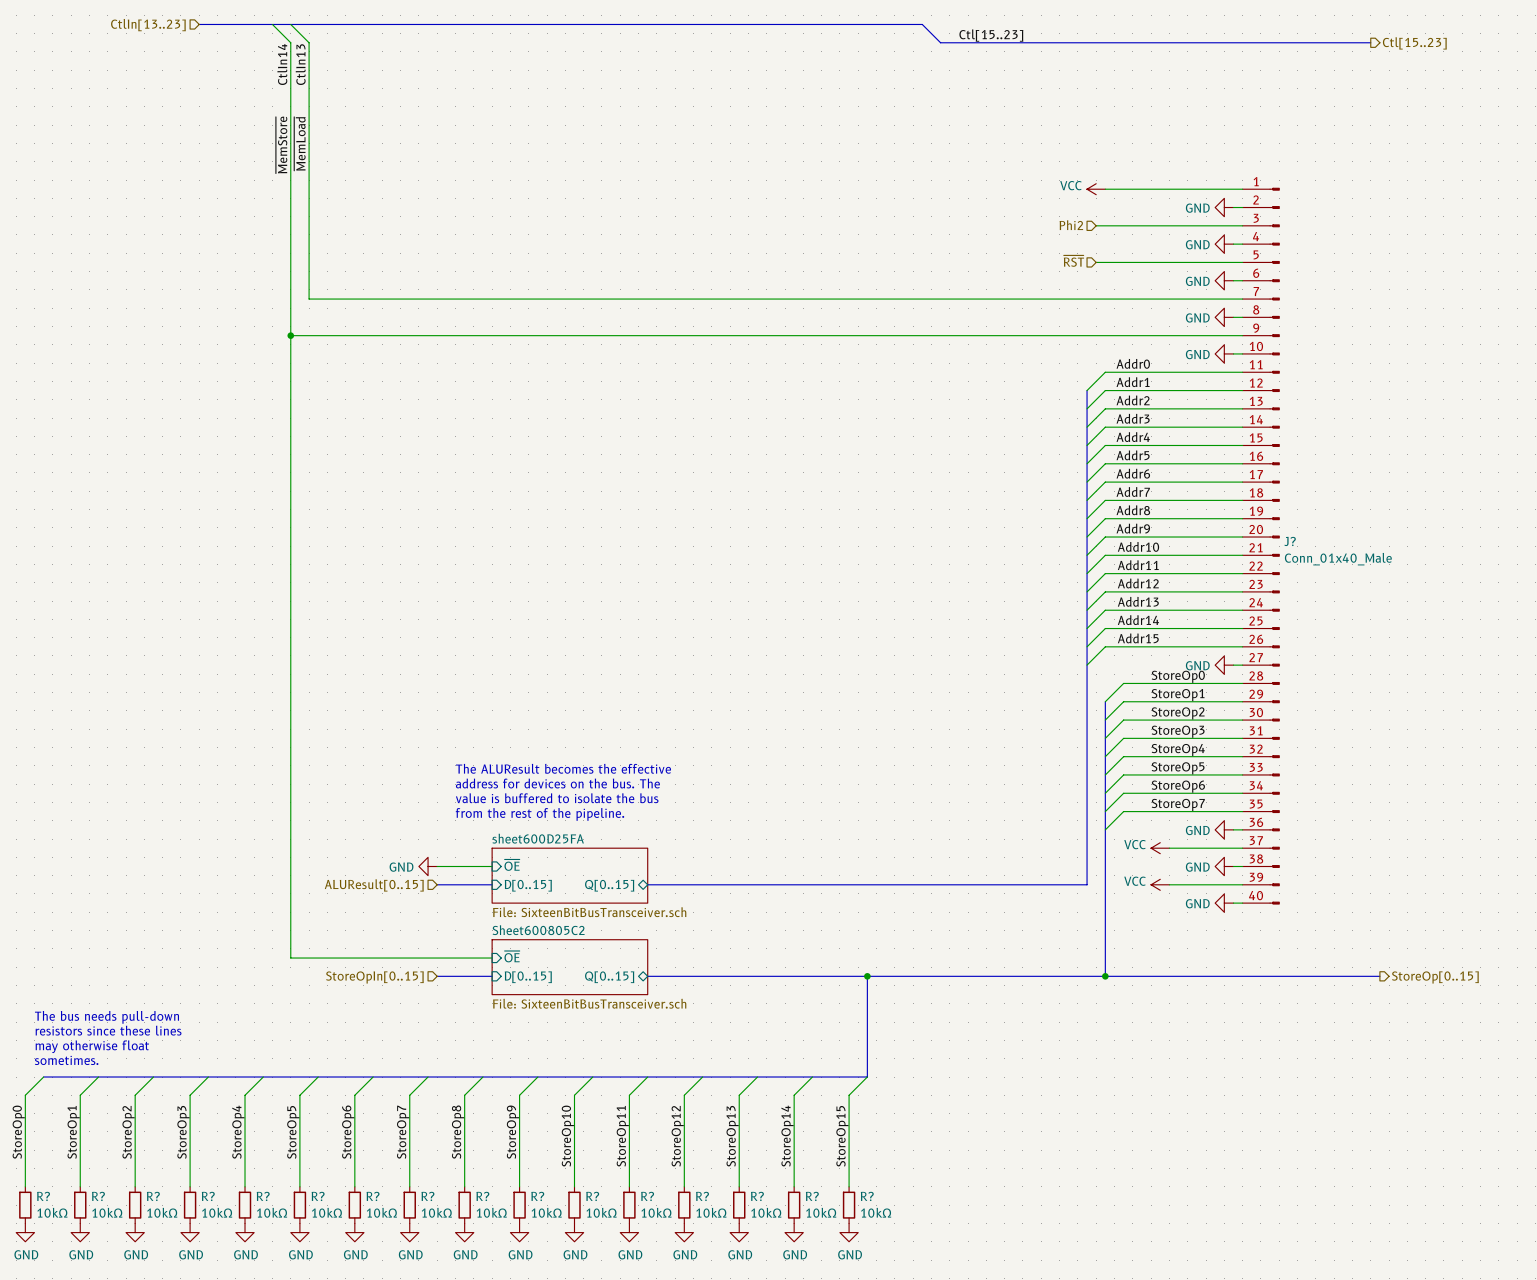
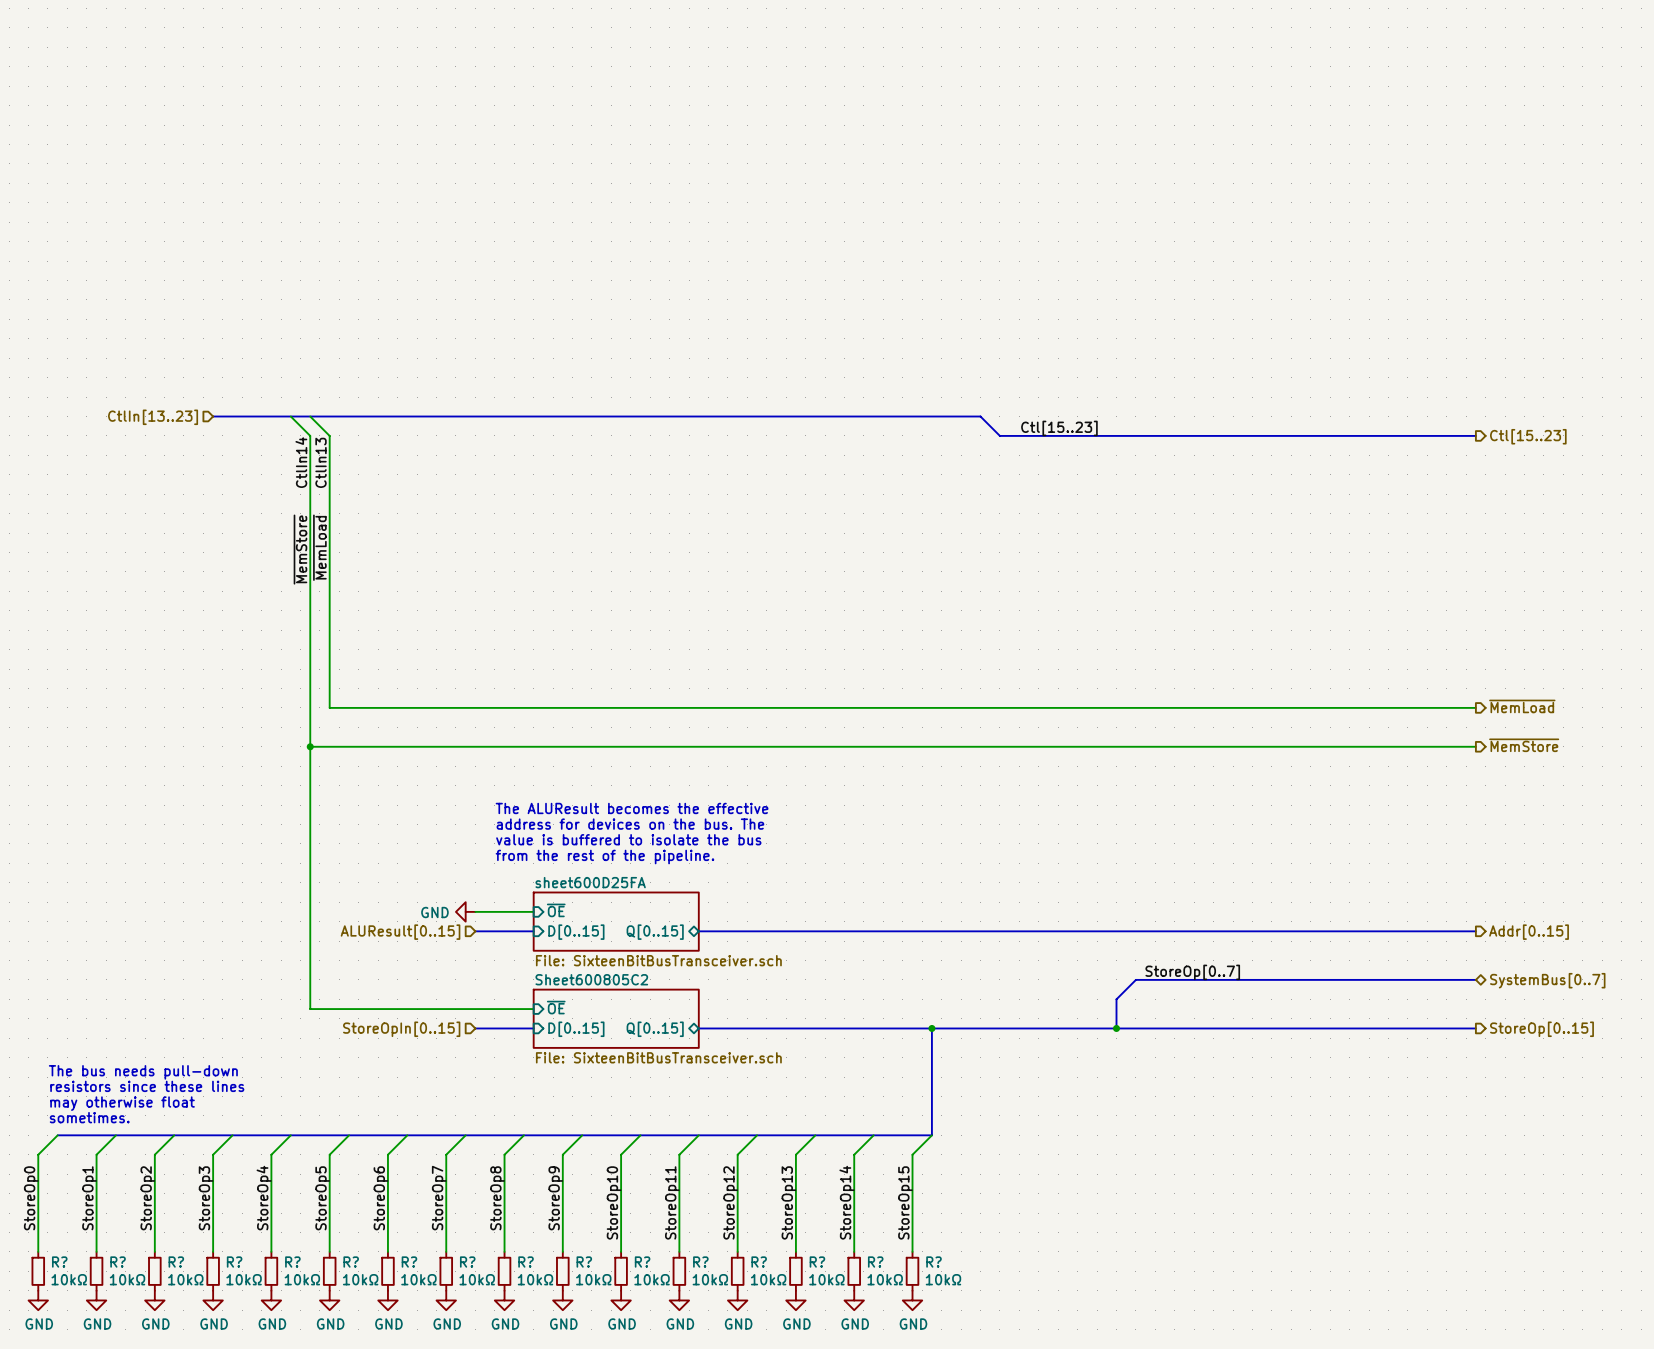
bus: (199, 24) (922, 24) (940, 42) (1370, 42) -> none
wire: (272, 24) (290, 42) (290, 958) -> (290, 416) (310, 435) (310, 1009) (319, 1009)
wire: (290, 24) (309, 42) (309, 299) (1242, 299) -> none
hierarchical label: CtlIn[13..23] (148, 25) -> none
label: Ctl[15..23] (991, 35) -> none
hierarchical label: Ctl[15..23] (1414, 43) -> none
label: CtlIn14 (282, 64) -> none
label: CtlIn13 (300, 64) -> none
label: ~{MemLoad} (299, 143) -> none
label: ~{MemStore} (281, 145) -> none
power symbol: VCC (1096, 189) -> none
wire: (1105, 189) (1242, 189) -> none
power symbol: GND (1224, 207) -> none
wire: (1233, 207) (1242, 207) -> none
hierarchical label: Phi2 (1071, 225) -> none
wire: (1096, 225) (1242, 225) -> none
power symbol: GND (1224, 244) -> none
wire: (1233, 244) (1242, 244) -> none
hierarchical label: ~{RST} (1073, 261) -> none
wire: (1096, 262) (1242, 262) -> none
power symbol: GND (1224, 280) -> none
wire: (1233, 280) (1242, 280) -> none
power symbol: GND (1224, 317) -> none
wire: (1233, 317) (1242, 317) -> none
wire: (290, 335) (1242, 335) -> none
junction: (290, 335) -> none
power symbol: GND (1224, 353) -> none
wire: (1233, 353) (1242, 353) -> none
label: Addr0 (1133, 363) -> none
wire: (1242, 372) (1105, 372) (1087, 390) -> none
label: Addr1 (1133, 382) -> none
bus: (1087, 390) (1087, 884) -> (1475, 931) (1165, 931)
wire: (1242, 390) (1105, 390) (1087, 408) -> none
bus: none -> (213, 416) (980, 416) (999, 435) (1475, 435)
wire: none -> (310, 416) (329, 435) (329, 707) (1475, 707)
hierarchical label: none -> CtlIn[13..23] (153, 417)
label: Addr2 (1133, 400) -> none
wire: (1242, 408) (1105, 408) (1087, 427) -> none
label: none -> Ctl[15..23] (1059, 428)
label: Addr3 (1133, 418) -> none
hierarchical label: none -> Ctl[15..23] (1528, 436)
wire: (1242, 427) (1105, 427) (1087, 445) -> none
label: Addr4 (1133, 437) -> none
label: none -> CtlIn14 (301, 462)
label: none -> CtlIn13 (321, 462)
wire: (1242, 445) (1105, 445) (1087, 463) -> none
label: Addr5 (1133, 455) -> none
wire: (1242, 463) (1105, 463) (1087, 482) -> none
label: Addr6 (1133, 473) -> none
wire: (1242, 482) (1105, 482) (1087, 500) -> none
label: Addr7 (1133, 491) -> none
wire: (1242, 500) (1105, 500) (1087, 518) -> none
label: Addr8 (1133, 510) -> none
wire: (1242, 518) (1105, 518) (1087, 537) -> none
label: none -> ~{MemLoad} (319, 547)
label: none -> ~{MemStore} (300, 549)
label: Addr9 (1133, 528) -> none
wire: (1242, 537) (1105, 537) (1087, 555) -> none
label: Addr10 (1138, 546) -> none
J?: Conn_01x40_Male (1261, 546) -> none
wire: (1242, 555) (1105, 555) (1087, 573) -> none
label: Addr11 (1138, 565) -> none
wire: (1242, 573) (1105, 573) (1087, 591) -> none
label: Addr12 (1138, 583) -> none
wire: (1242, 591) (1105, 591) (1087, 610) -> none
label: Addr13 (1138, 601) -> none
wire: (1242, 610) (1105, 610) (1087, 628) -> none
label: Addr14 (1138, 620) -> none
wire: (1242, 628) (1105, 628) (1087, 646) -> none
label: Addr15 (1138, 638) -> none
wire: (1242, 646) (1105, 646) (1087, 665) -> none
power symbol: GND (1224, 665) -> none
wire: (1233, 665) (1242, 665) -> none
hierarchical label: none -> ~{MemLoad} (1522, 706)
label: StoreOp0 (1178, 676) -> none
wire: (1242, 683) (1123, 683) (1105, 701) -> none
label: StoreOp1 (1178, 695) -> none
bus: (1105, 701) (1105, 976) -> none
wire: (1242, 701) (1123, 701) (1105, 720) -> none
hierarchical label: none -> ~{MemStore} (1524, 745)
wire: none -> (310, 746) (1475, 746)
junction: none -> (310, 746)
label: StoreOp2 (1178, 713) -> none
wire: (1242, 720) (1123, 720) (1105, 738) -> none
label: StoreOp3 (1178, 731) -> none
wire: (1242, 738) (1123, 738) (1105, 756) -> none
label: StoreOp4 (1178, 750) -> none
wire: (1242, 756) (1123, 756) (1105, 774) -> none
label: StoreOp5 (1178, 768) -> none
wire: (1242, 774) (1123, 774) (1105, 793) -> none
label: StoreOp6 (1178, 786) -> none
wire: (1242, 793) (1123, 793) (1105, 811) -> none
label: StoreOp7 (1178, 804) -> none
wire: (1242, 811) (1123, 811) (1105, 829) -> none
power symbol: GND (1224, 829) -> none
wire: (1233, 829) (1242, 829) -> none
power symbol: VCC (1160, 848) -> none
wire: (1169, 848) (1242, 848) -> none
power symbol: GND (1224, 866) -> none
wire: (1233, 866) (1242, 866) -> none
power symbol: VCC (1160, 884) -> none
hierarchical label: none -> Addr[0..15] (1529, 932)
power symbol: GND (1224, 903) -> none
wire: (1233, 903) (1242, 903) -> none
label: none -> StoreOp[0..7] (1192, 972)
bus: none -> (1475, 979) (1135, 979) (1116, 999) (1116, 1028)
hierarchical label: none -> SystemBus[0..7] (1547, 980)
junction: none -> (1116, 1028)
junction: (1105, 976) -> none

